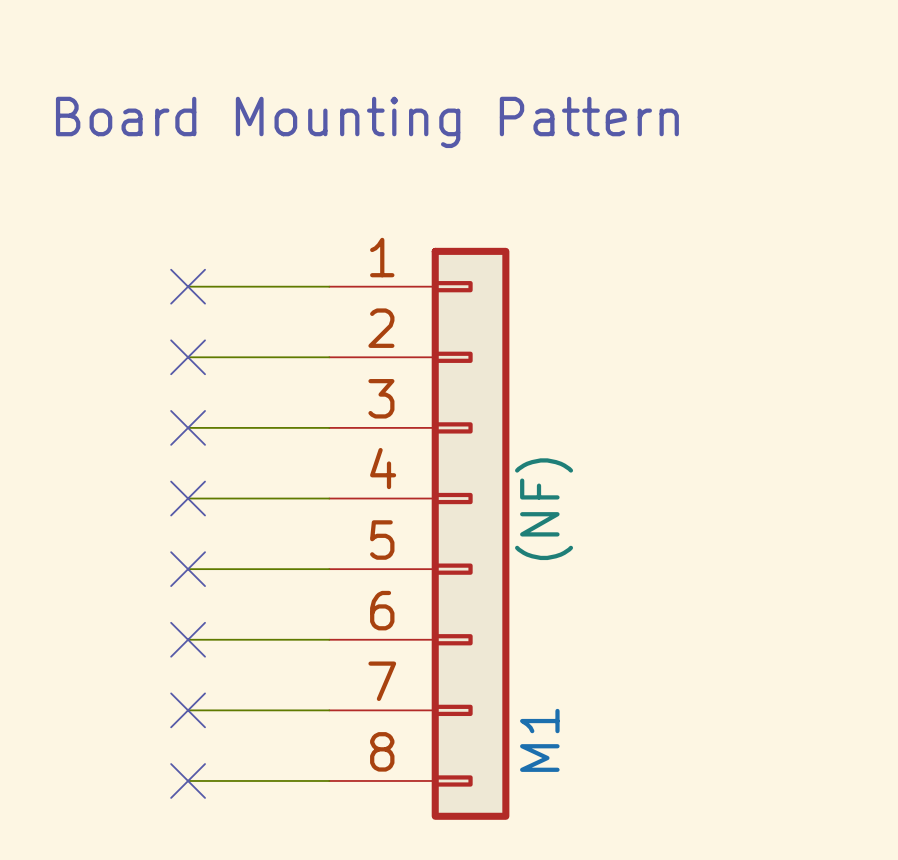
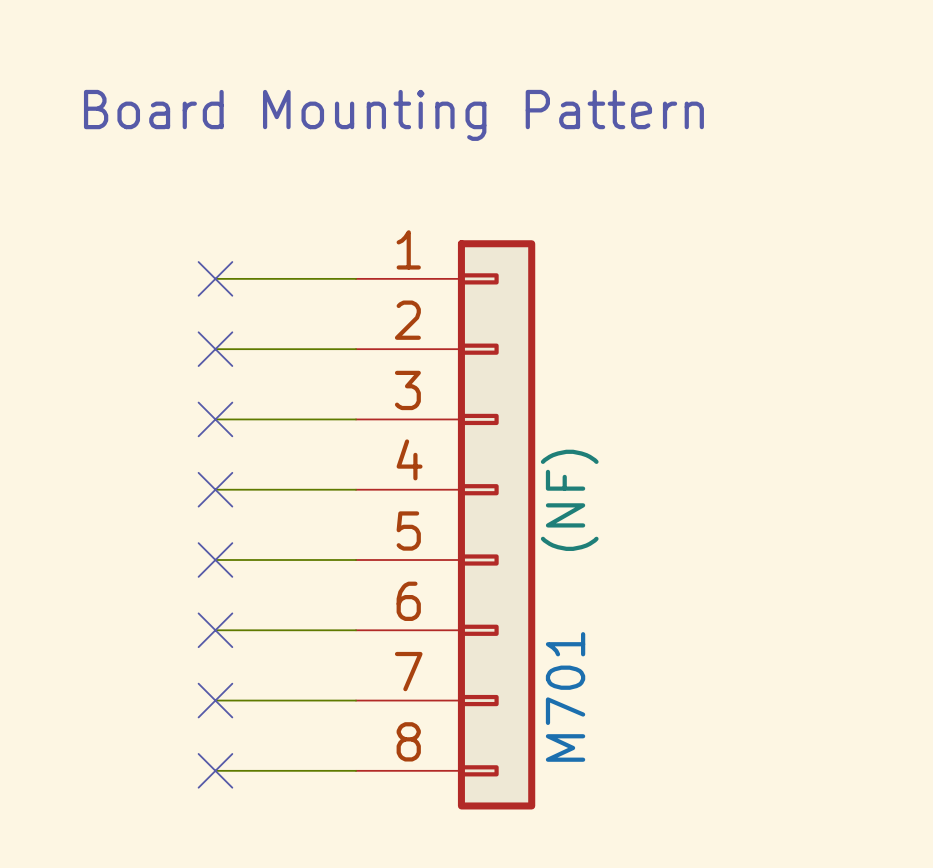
M1 name: M1 (539, 740) -> M701 (565, 696)

